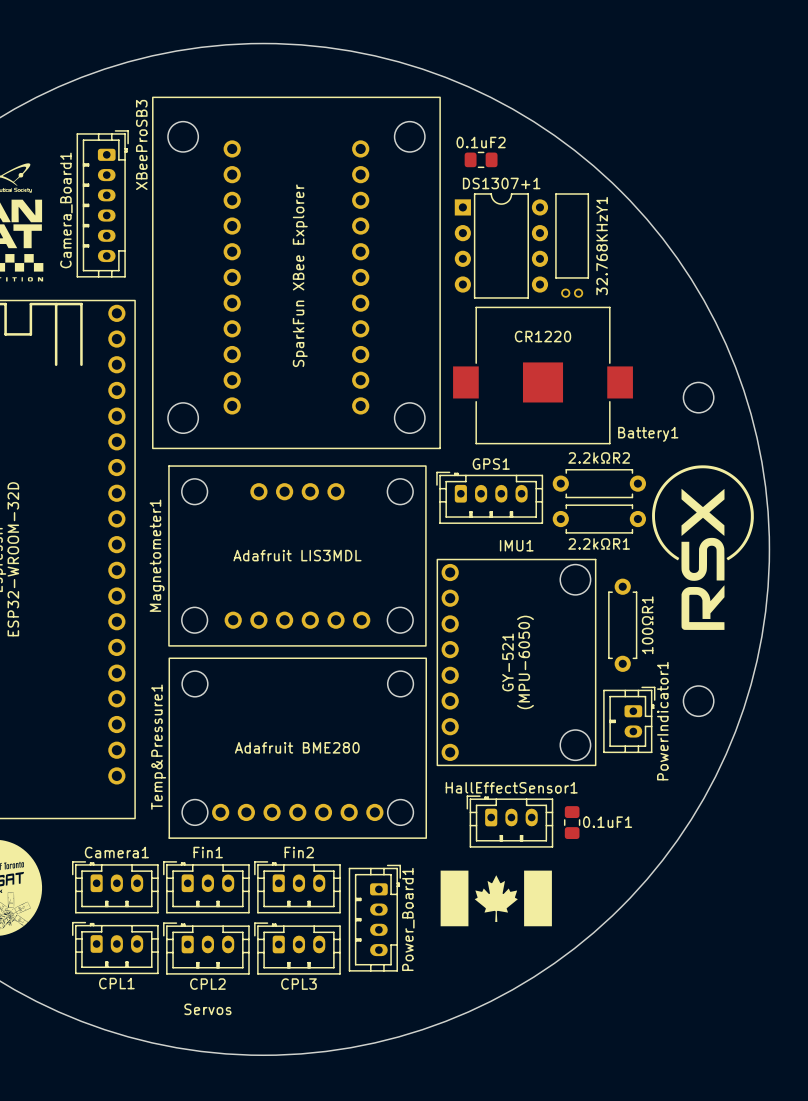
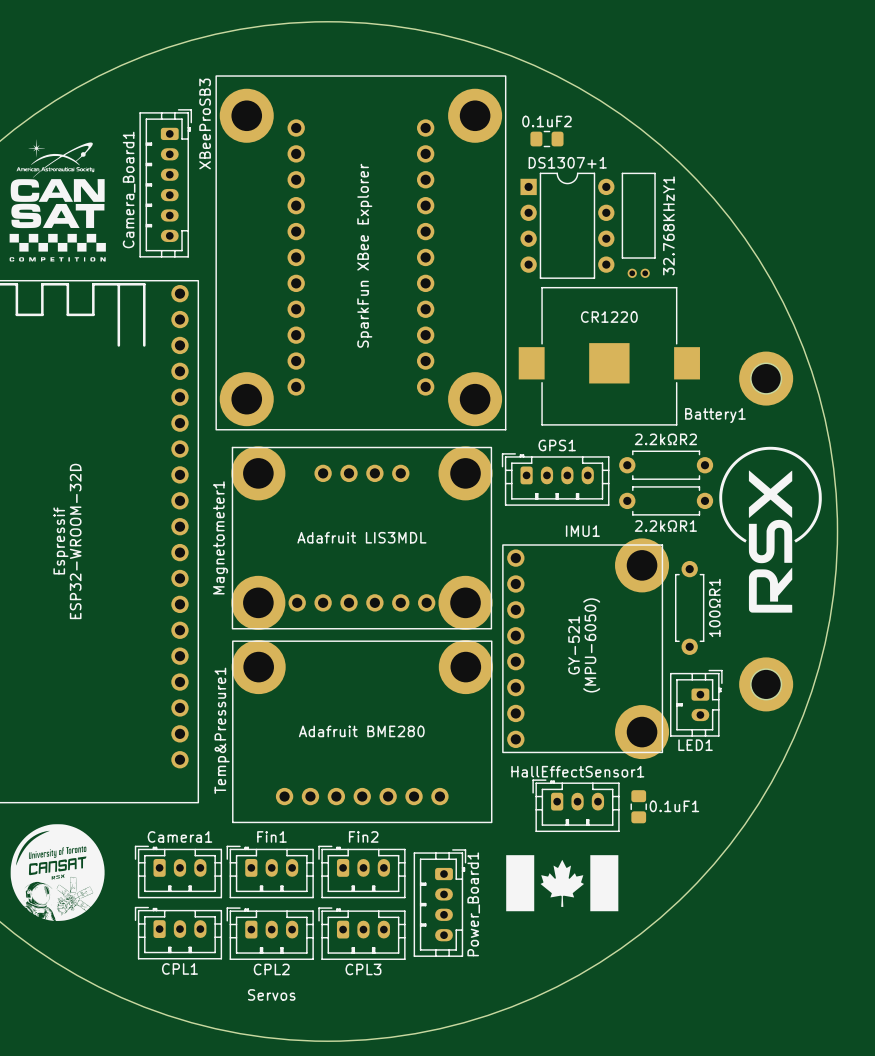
XBeeProSB3 footprint: [152, 96, 441, 449] -> [215, 75, 507, 431]
round board edge: [683, 382, 715, 414] -> none
part: none -> (766, 378)
Magnetometer1 footprint: [168, 465, 427, 647] -> [231, 446, 493, 630]
IMU1 footprint: [436, 559, 597, 766] -> [502, 538, 670, 760]
Temp&Pressure1 footprint: [168, 657, 427, 839] -> [231, 640, 493, 823]
round board edge: [683, 685, 715, 717] -> none
part: none -> (766, 684)
PowerIndicator1 name: PowerIndicator1 (662, 721) -> LED1 (695, 745)

